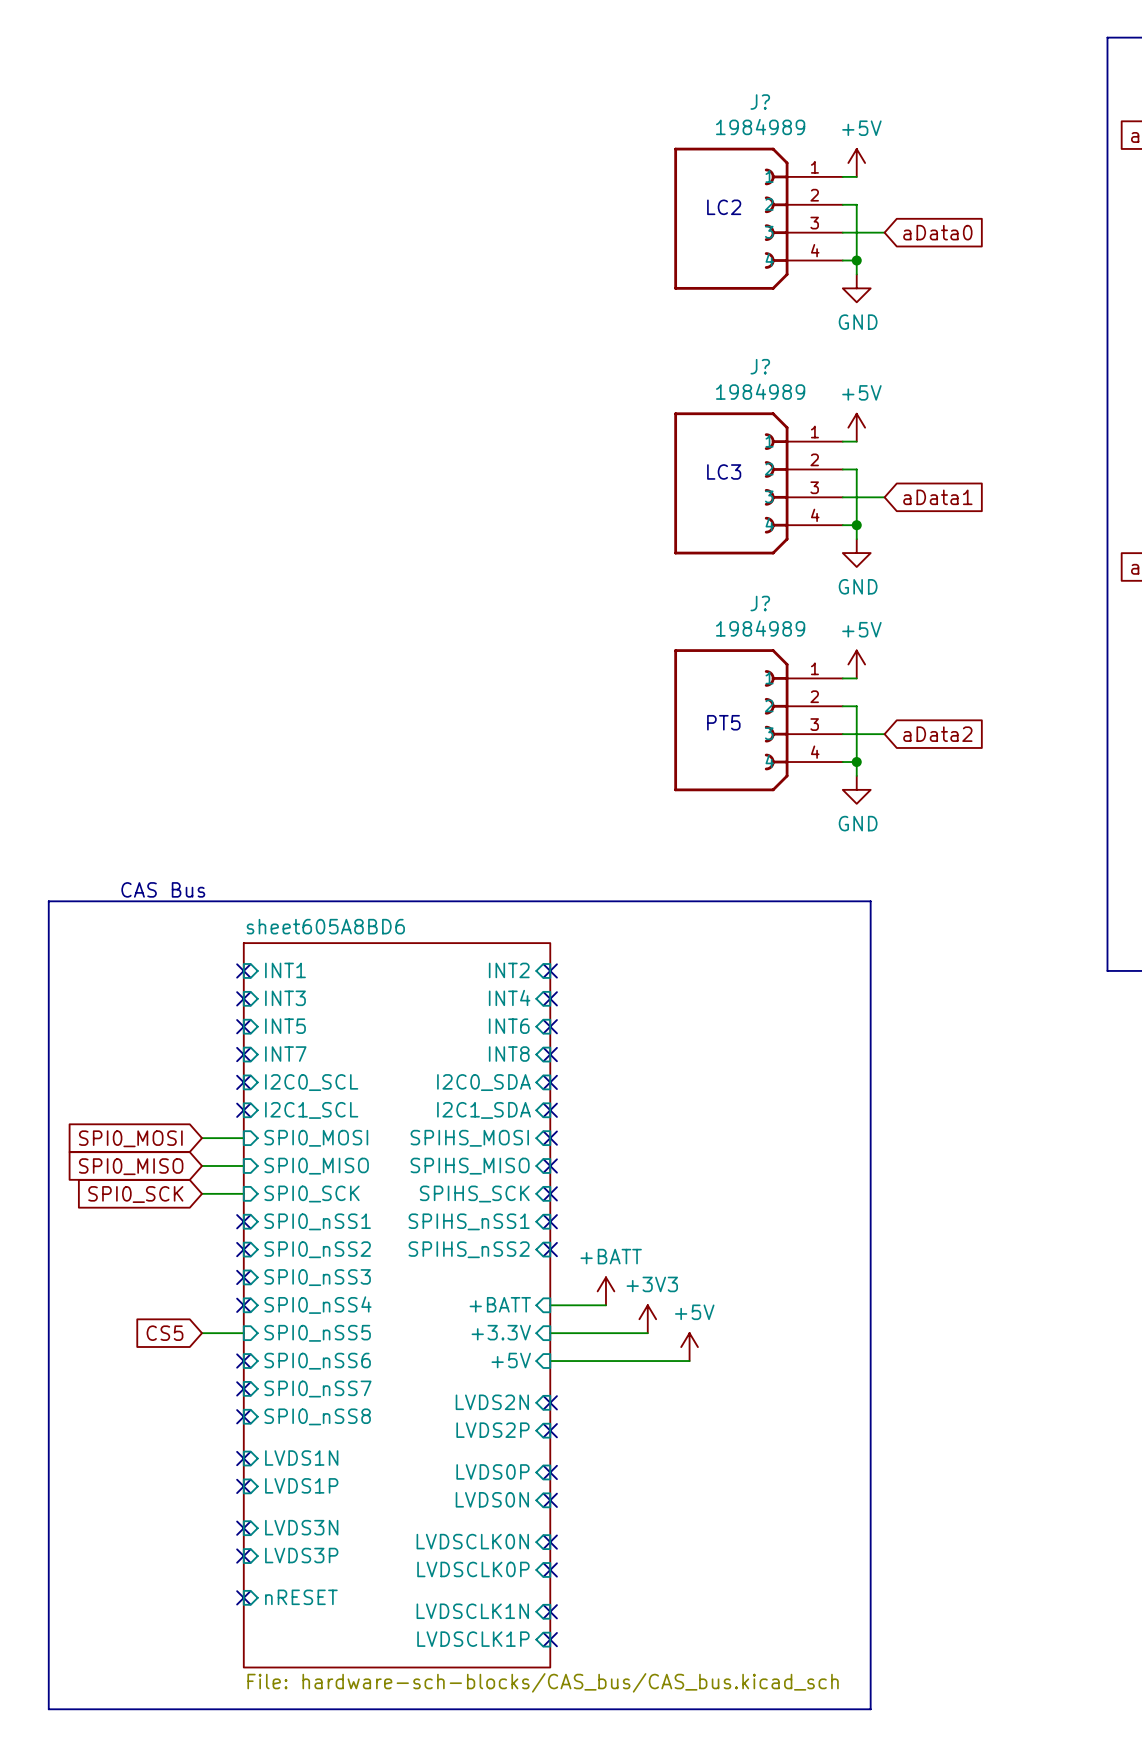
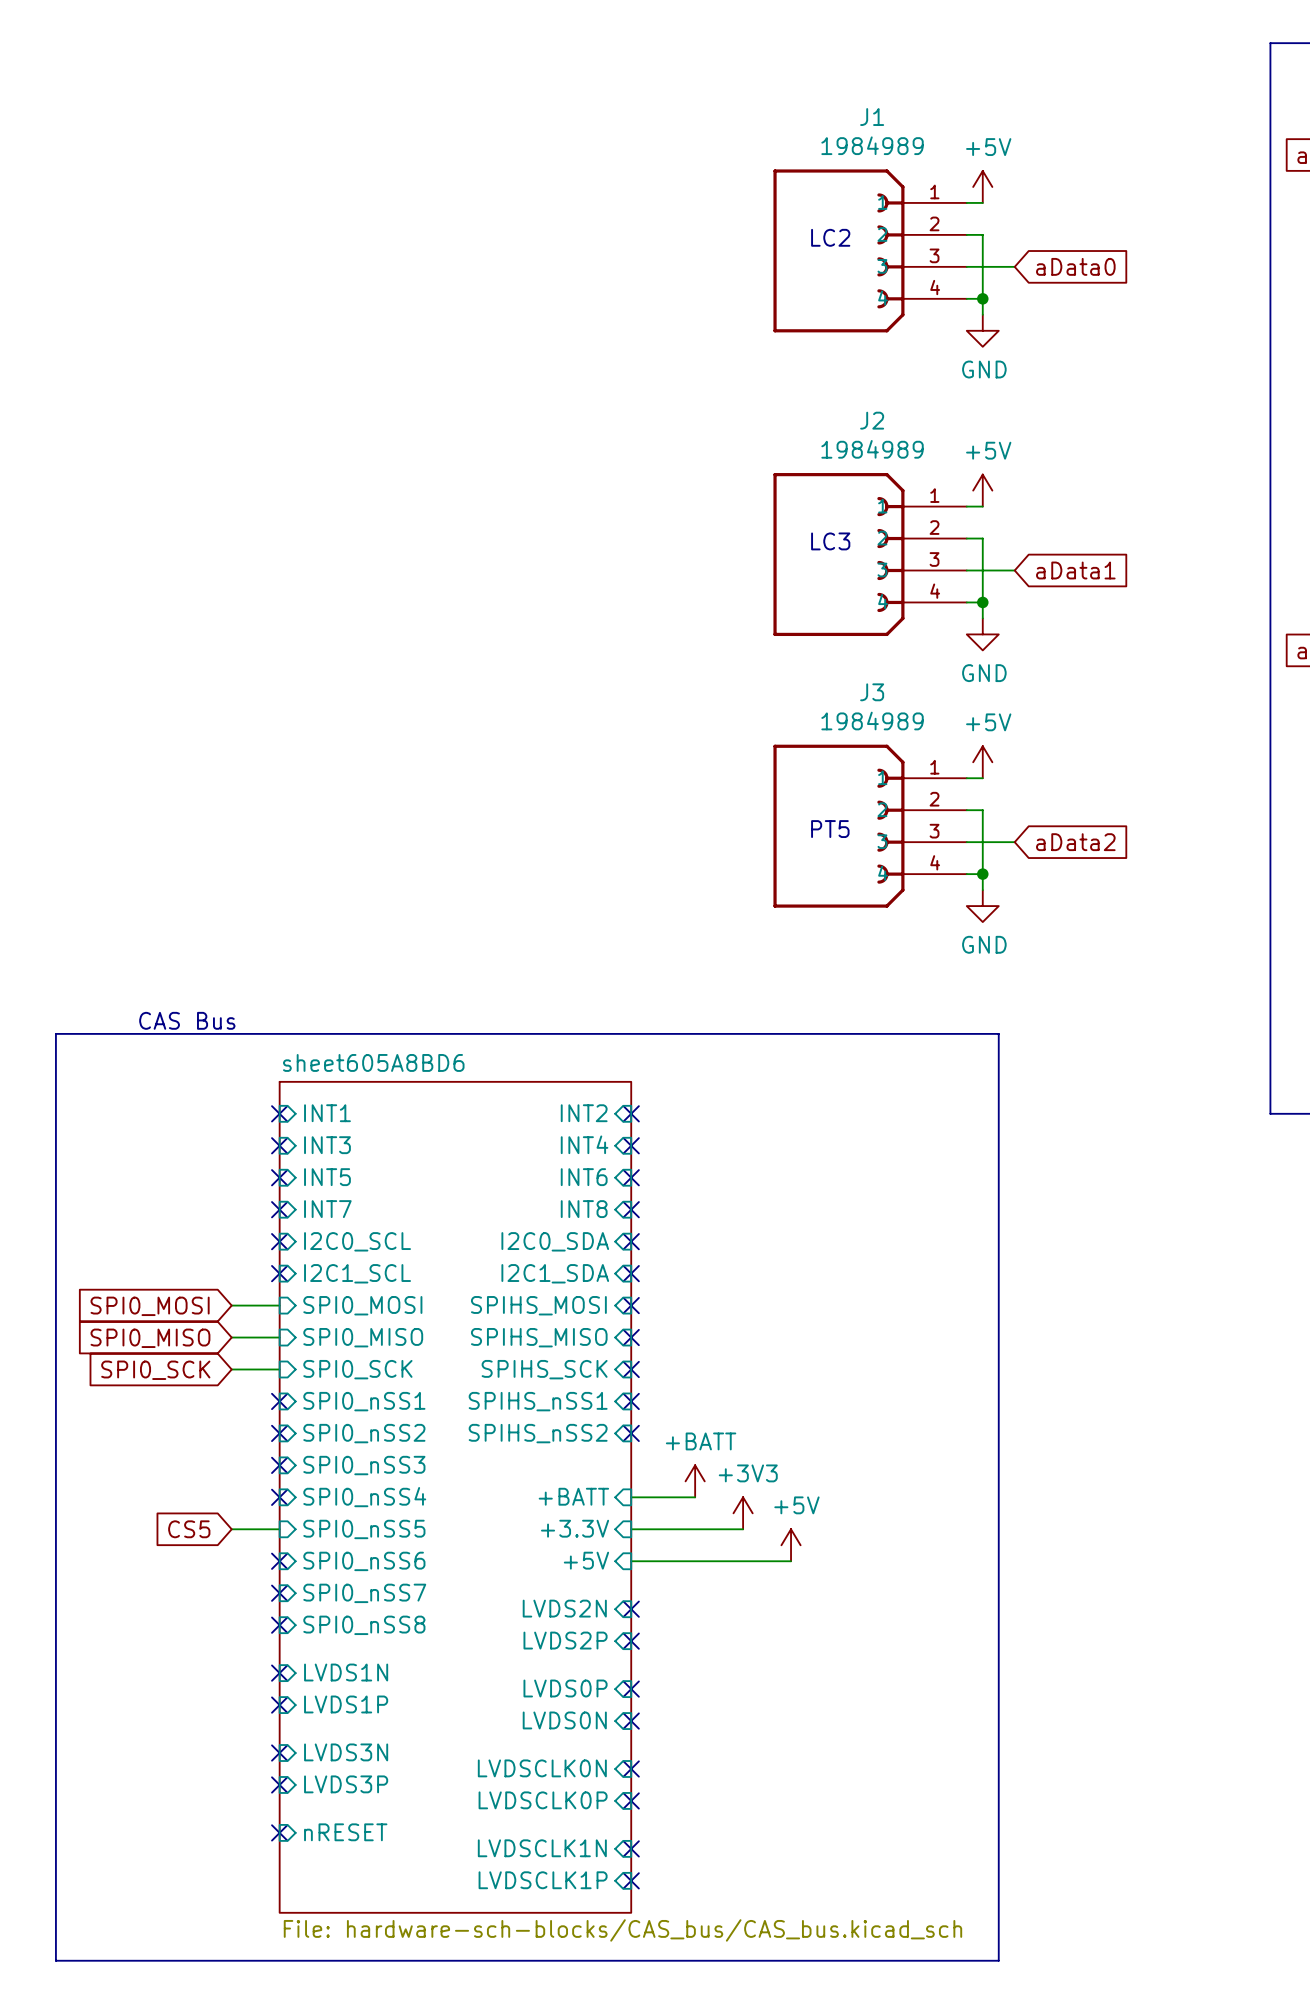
J? name: J? (760, 102) -> J1 (872, 117)
J? name: J? (760, 366) -> J2 (872, 420)
J? name: J? (760, 603) -> J3 (872, 692)

